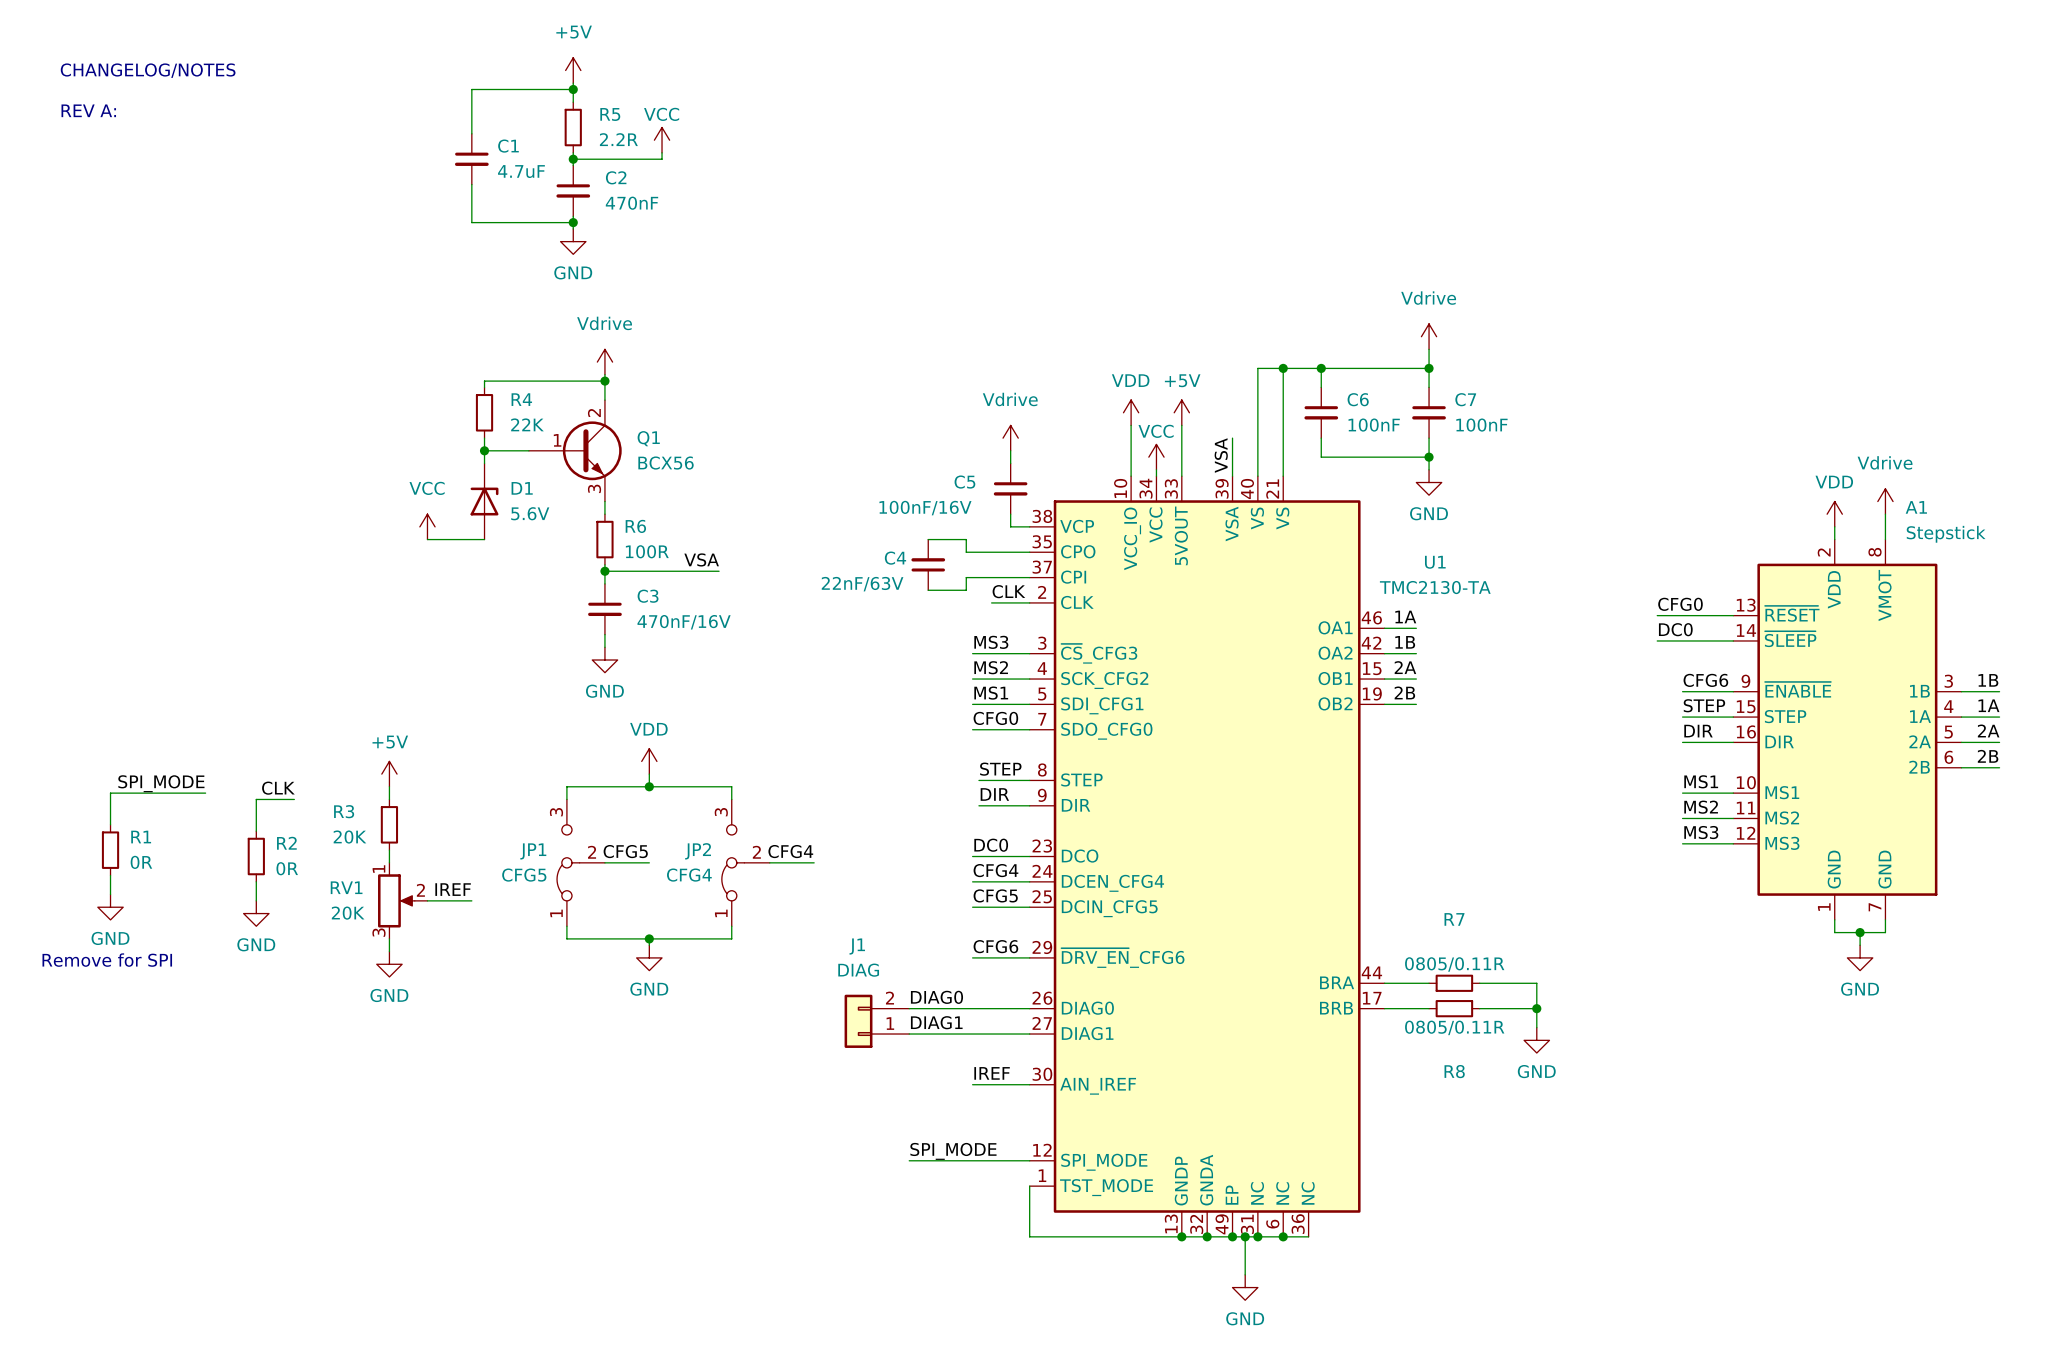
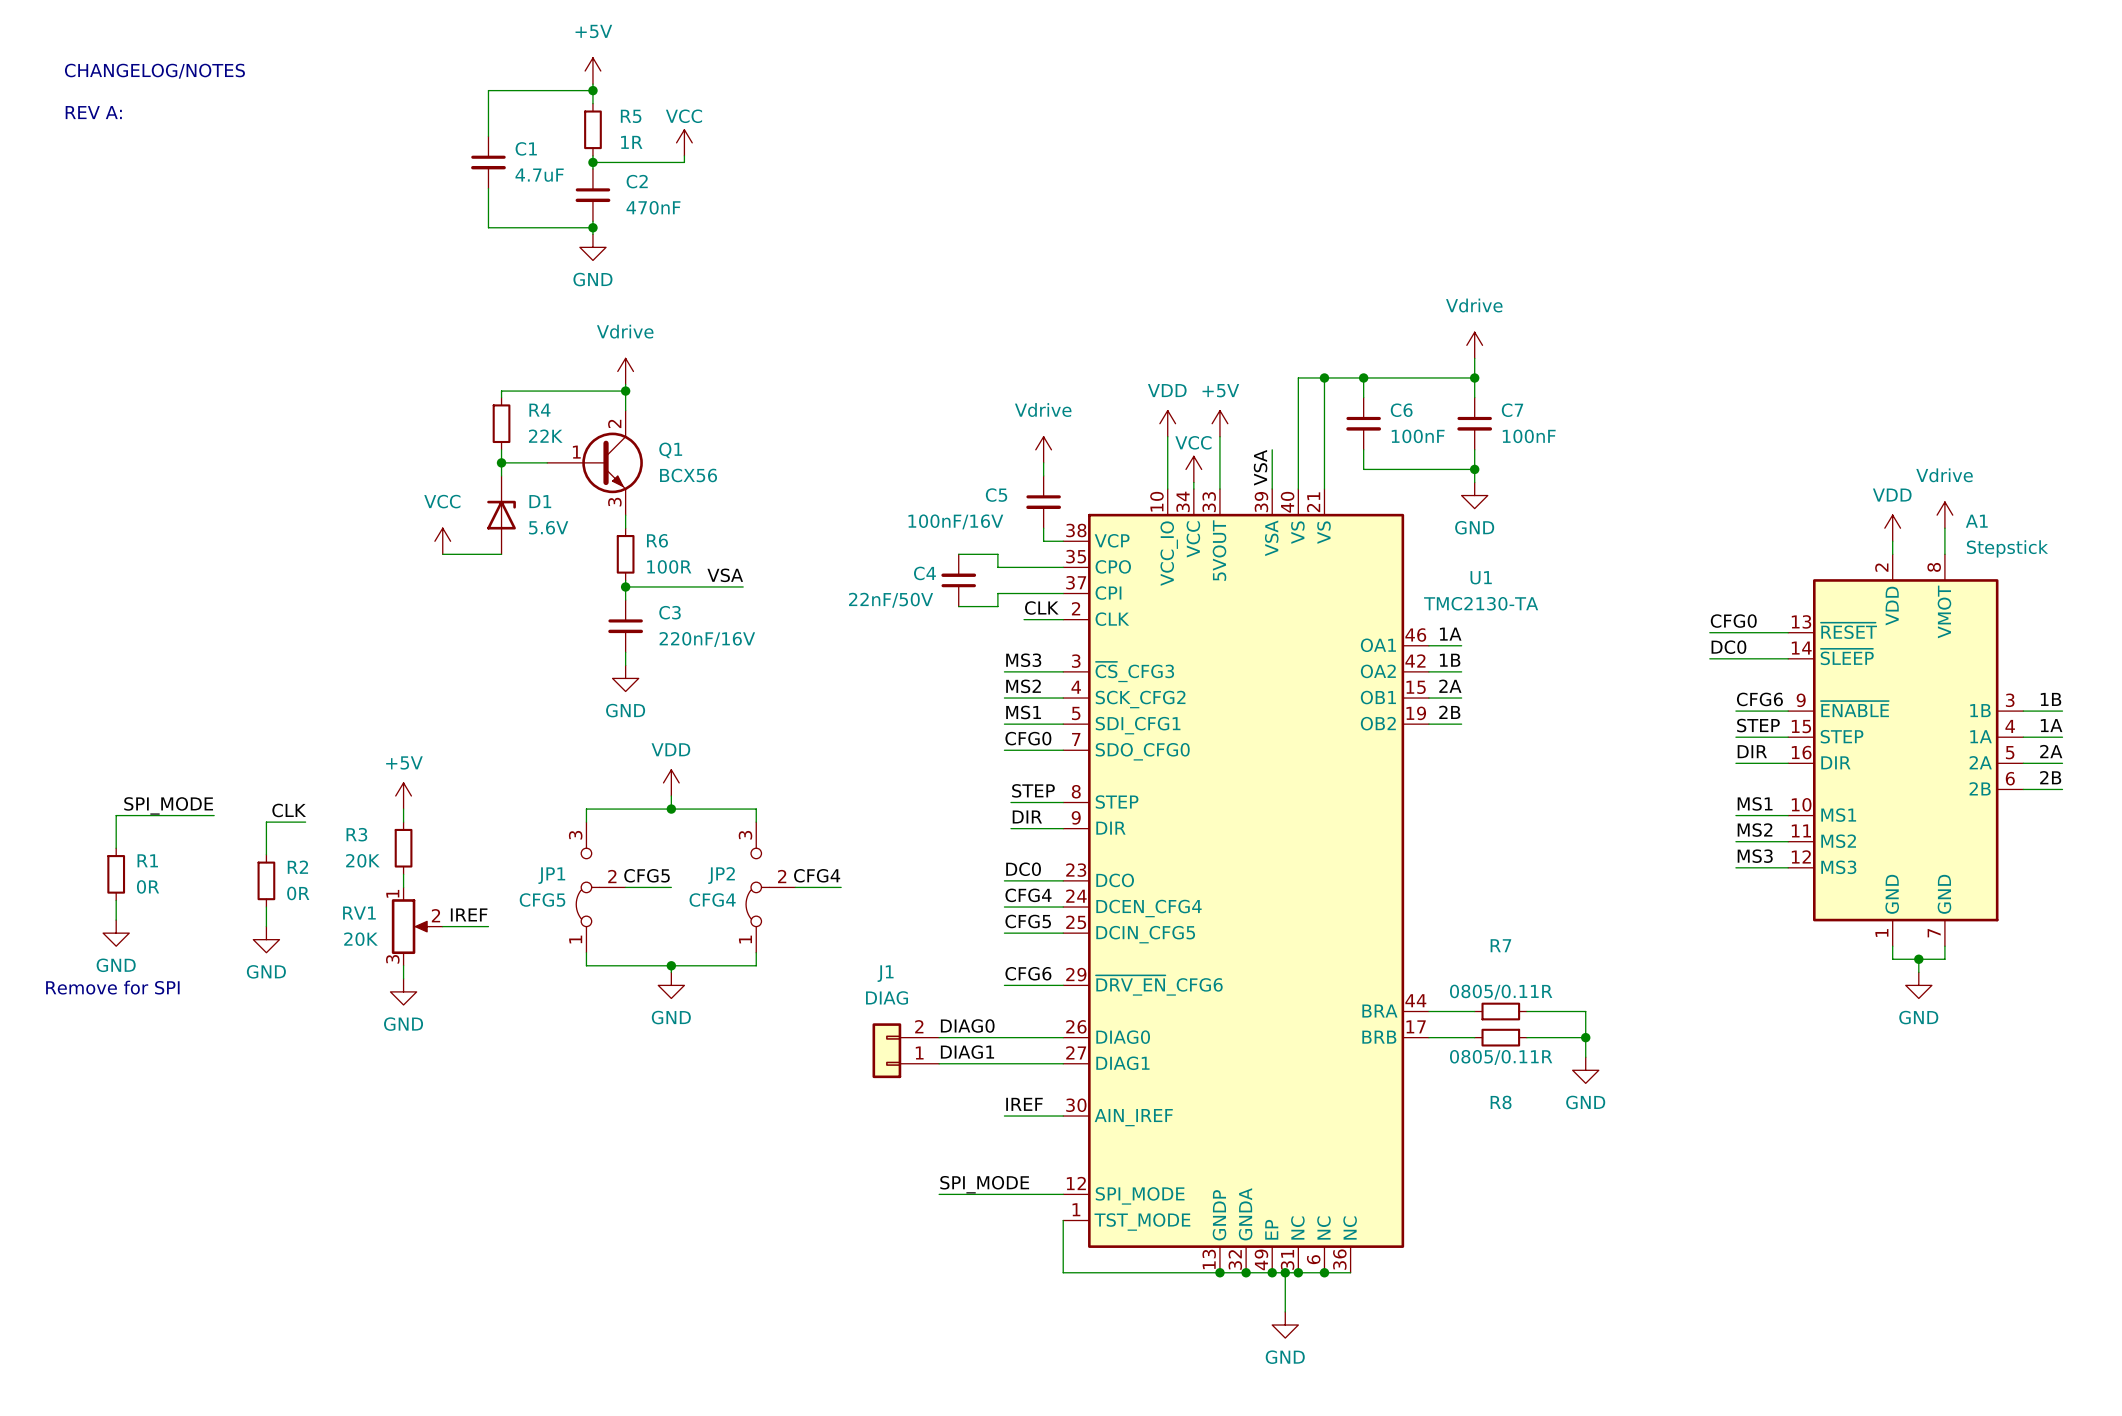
R5 value: 2.2R (618, 139) -> 1R (631, 142)
C4 value: 22nF/63V (862, 584) -> 22nF/50V (891, 600)
C3 value: 470nF/16V (684, 622) -> 220nF/16V (707, 639)

